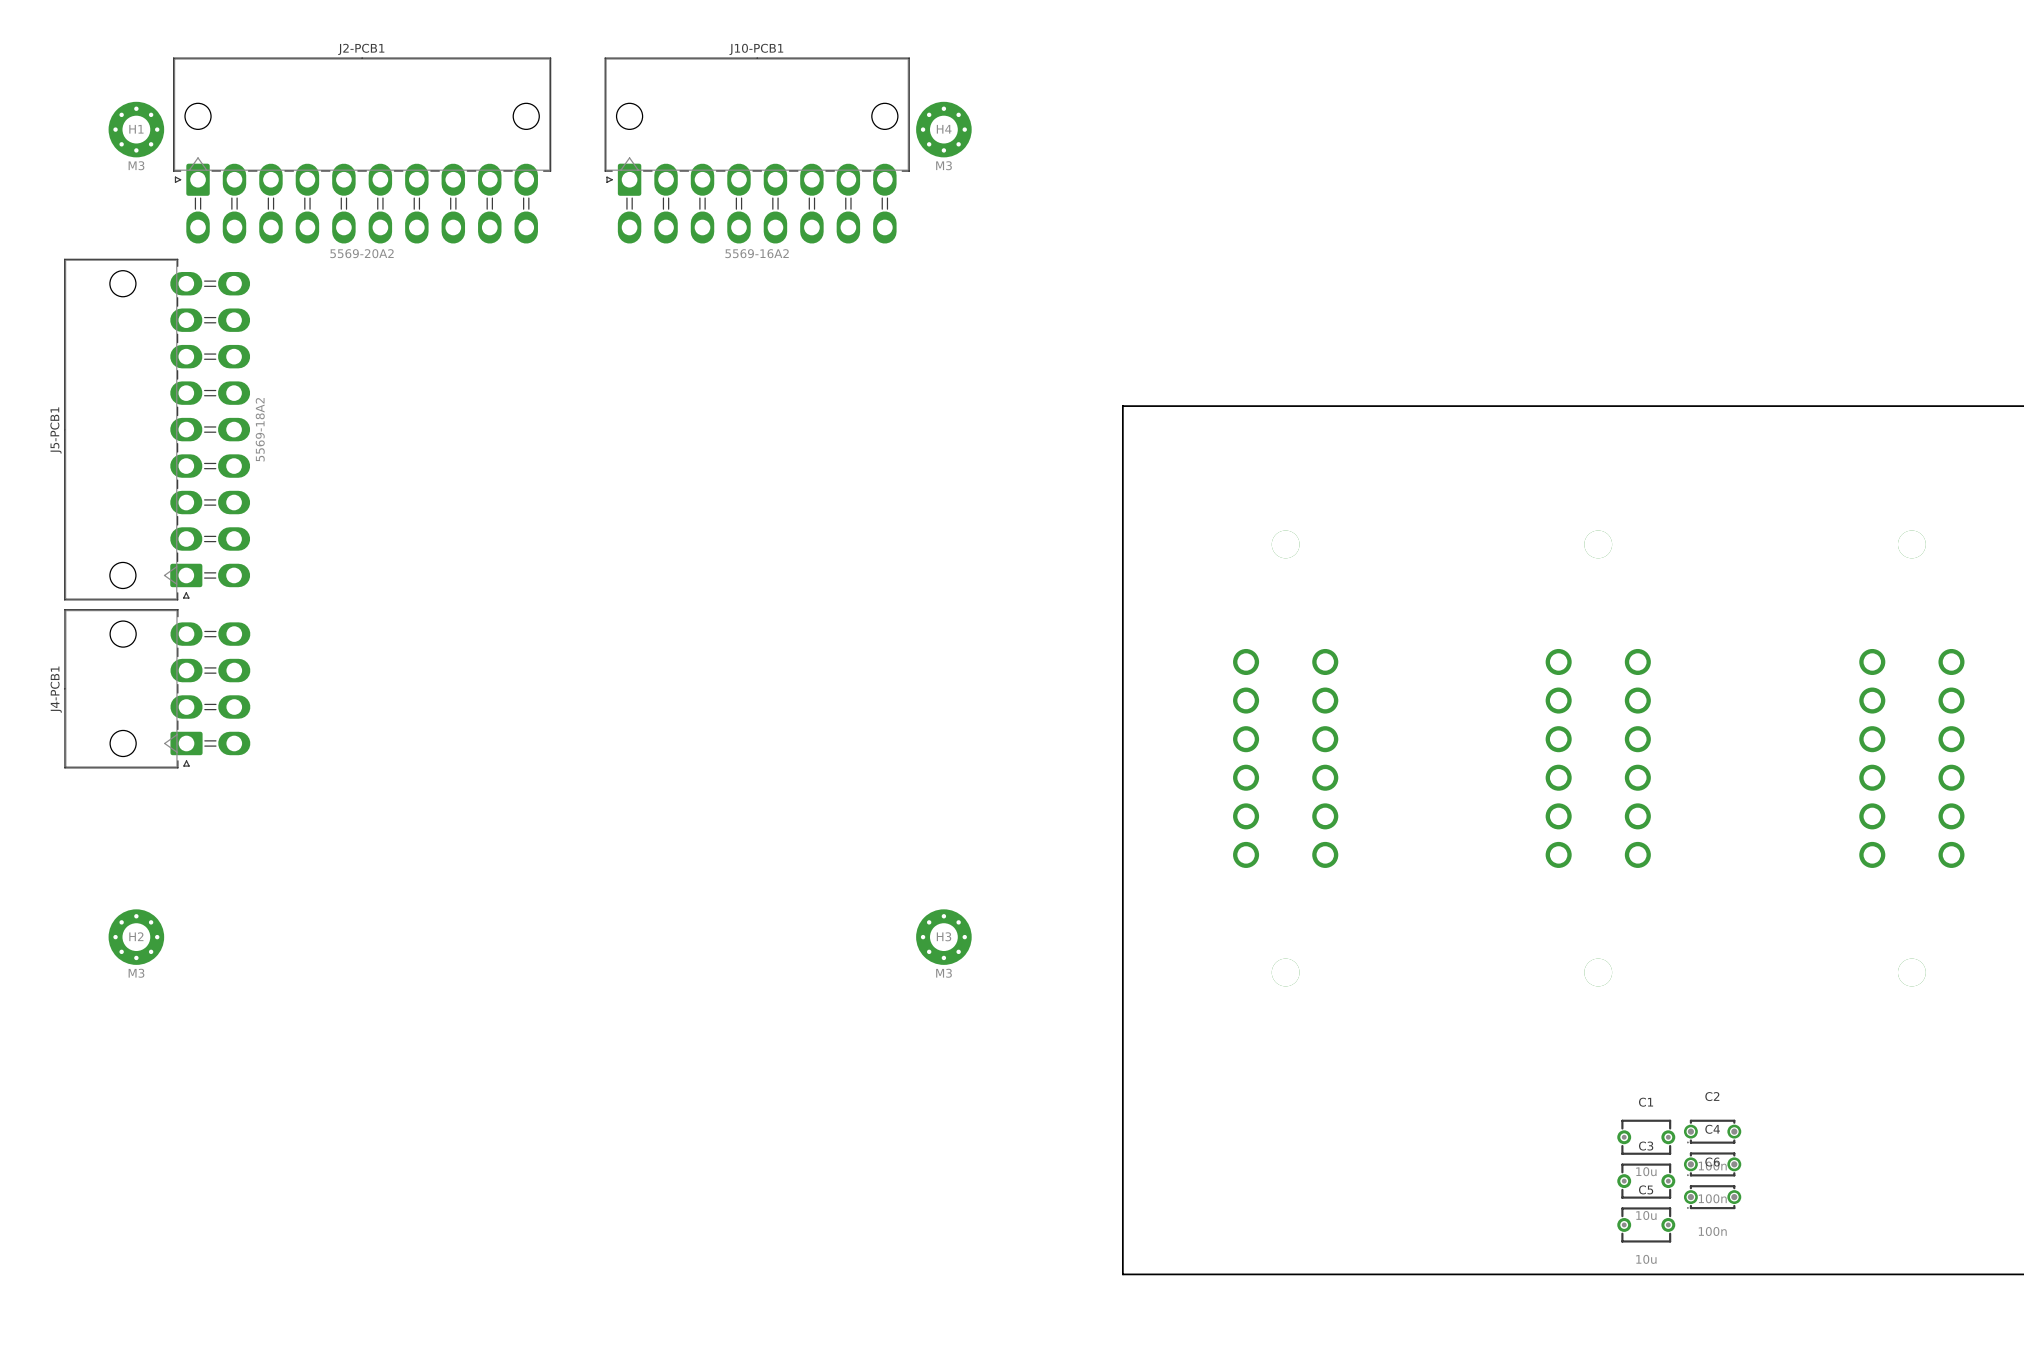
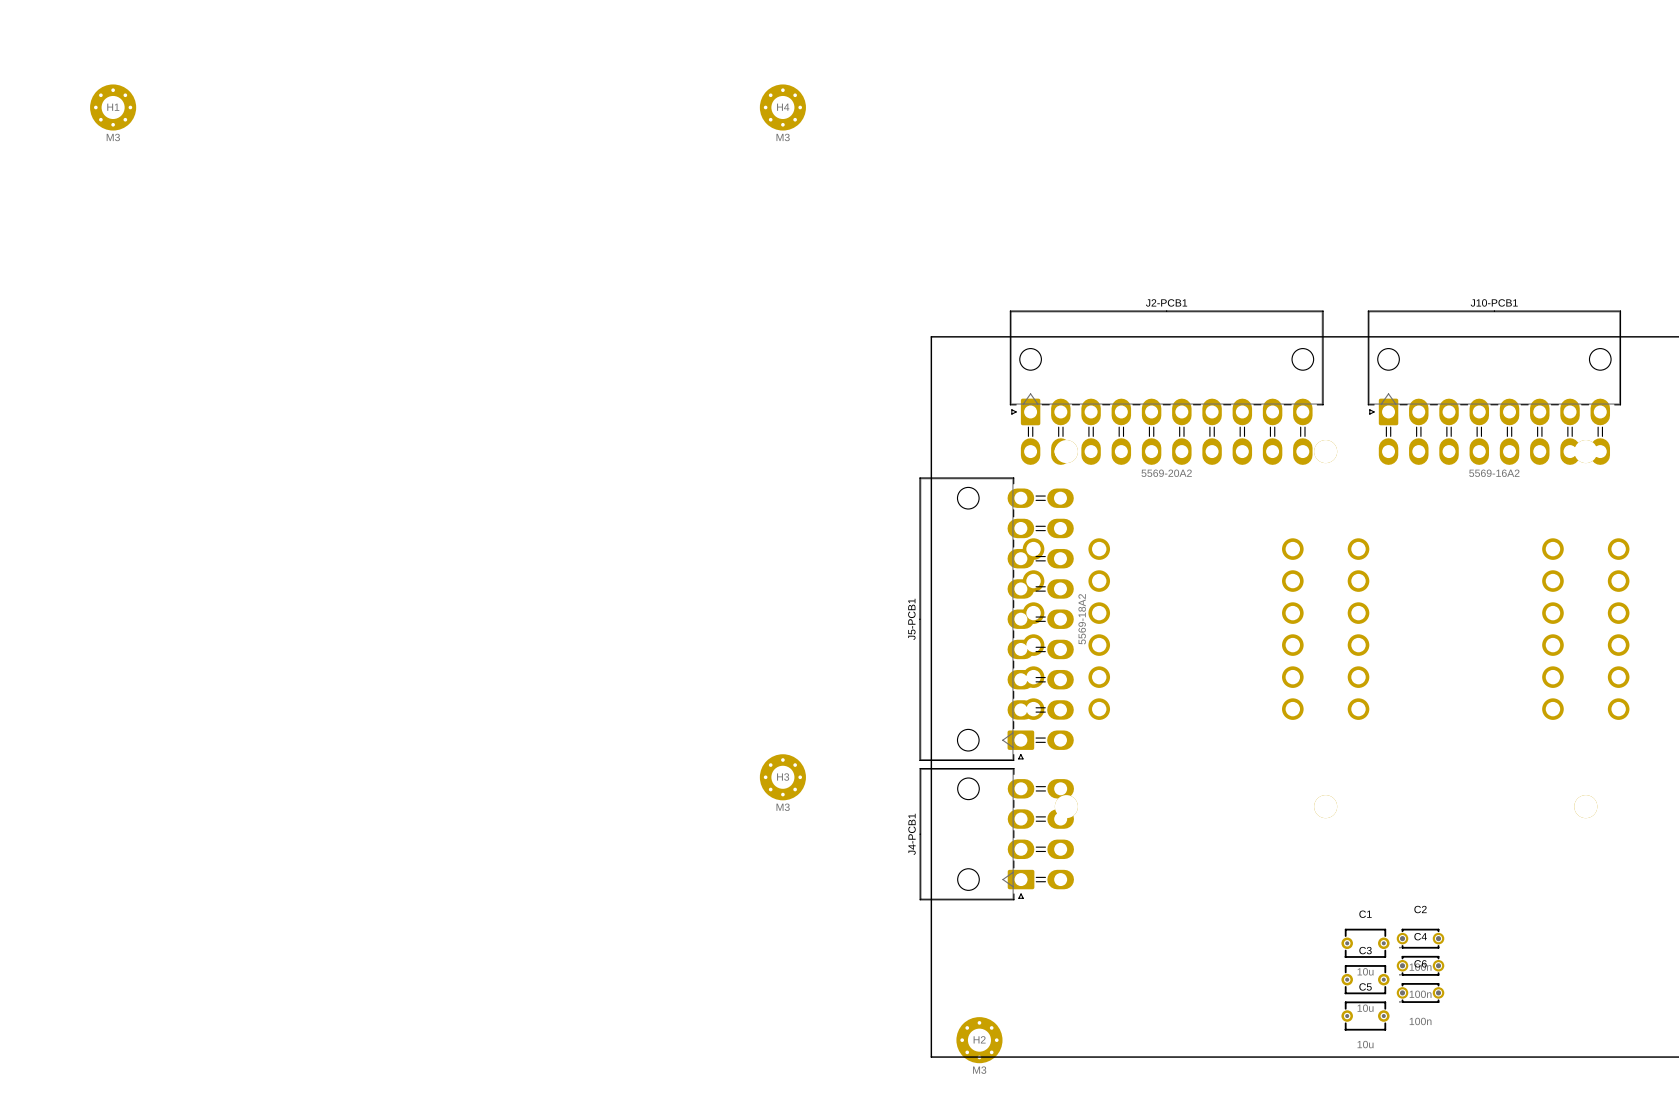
J2-PCB1 position: (362, 150) -> (1166, 387)
J10-PCB1 position: (757, 150) -> (1494, 387)
J5-PCB1 position: (157, 429) -> (996, 619)
J4-PCB1 position: (157, 688) -> (996, 834)
H2 position: (136, 937) -> (979, 1040)

